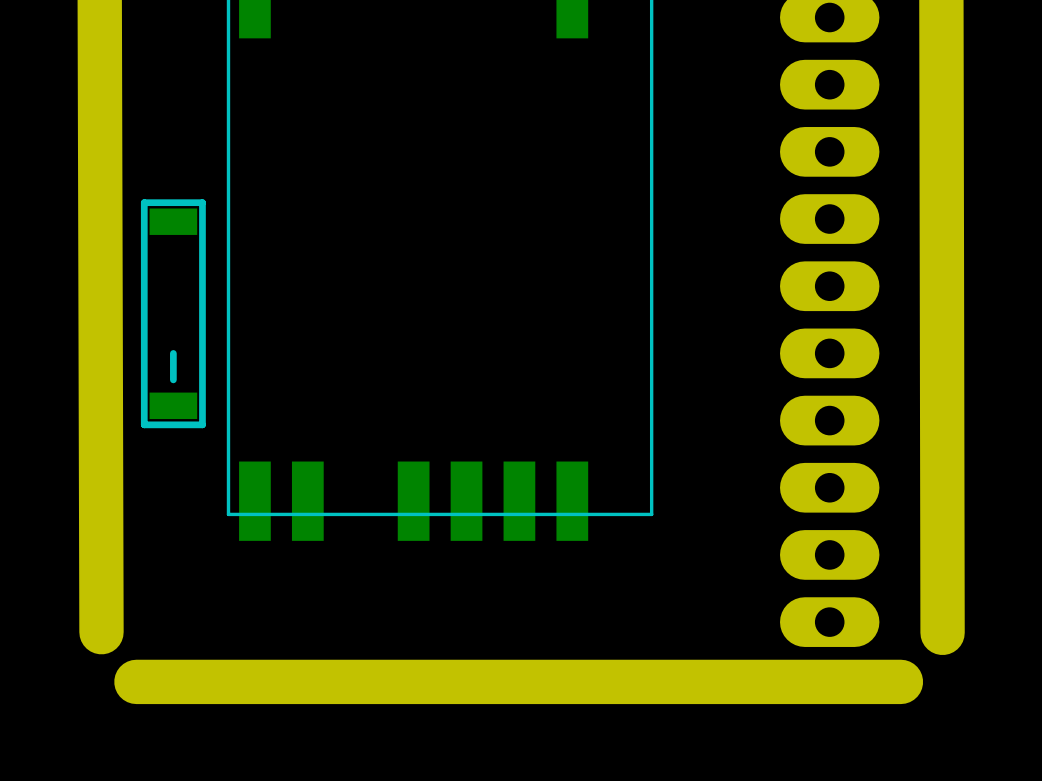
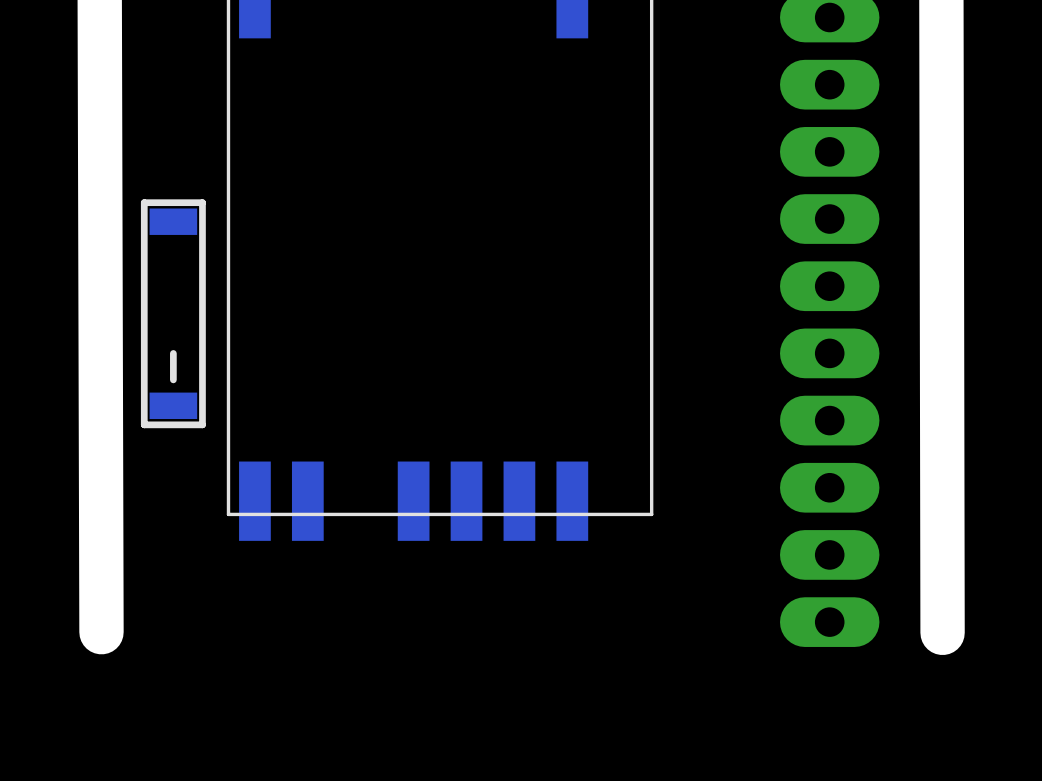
board edge: (900, 681) (136, 681) -> none

